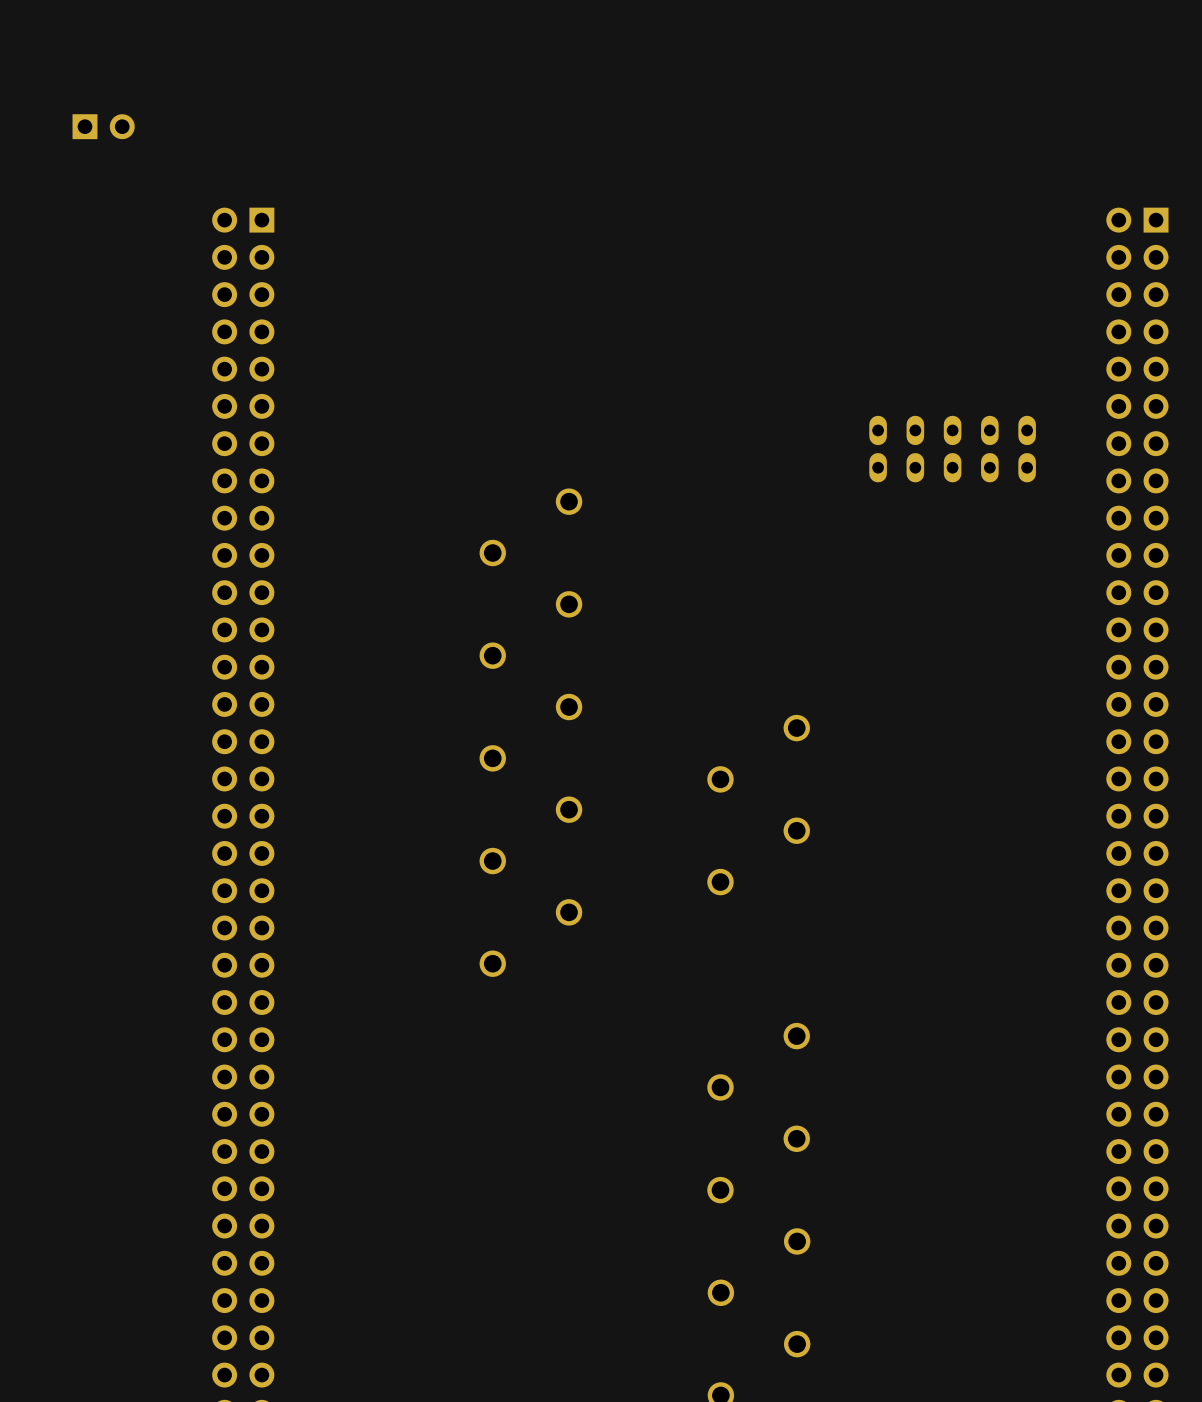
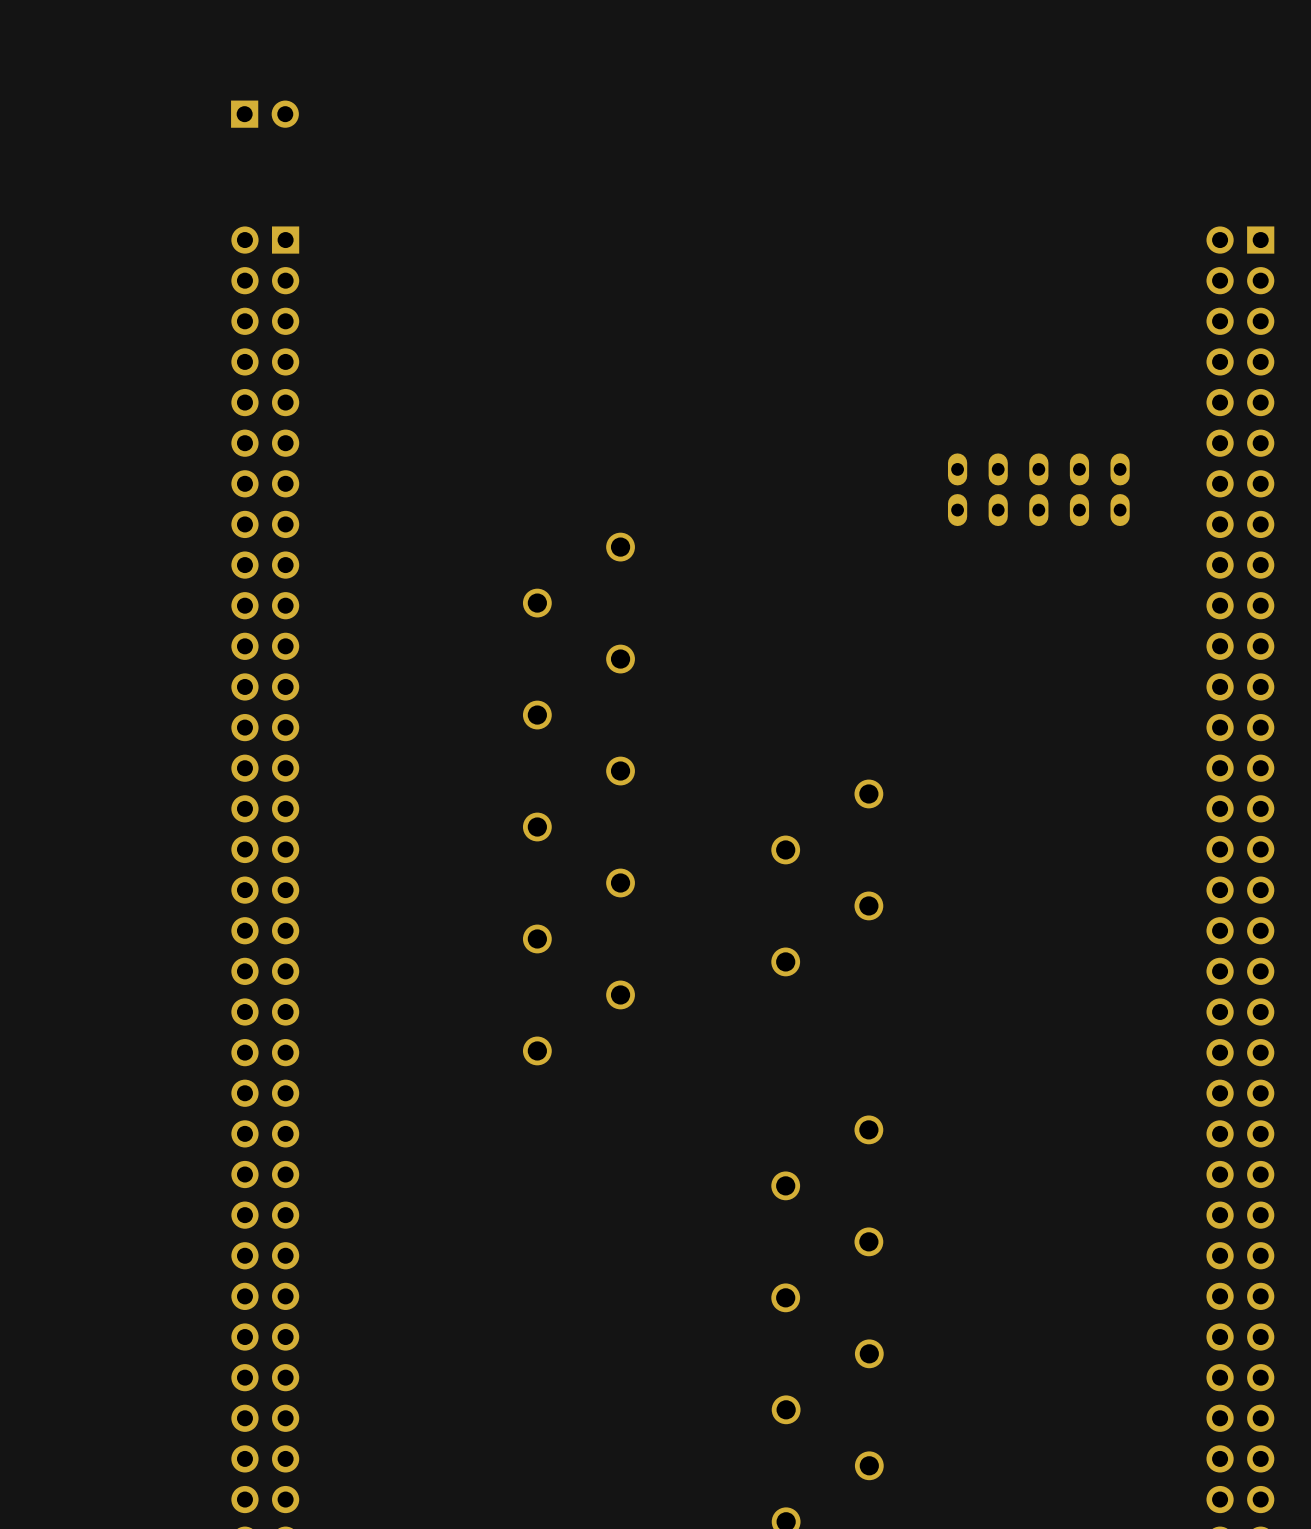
part position: (103, 126) -> (264, 114)

